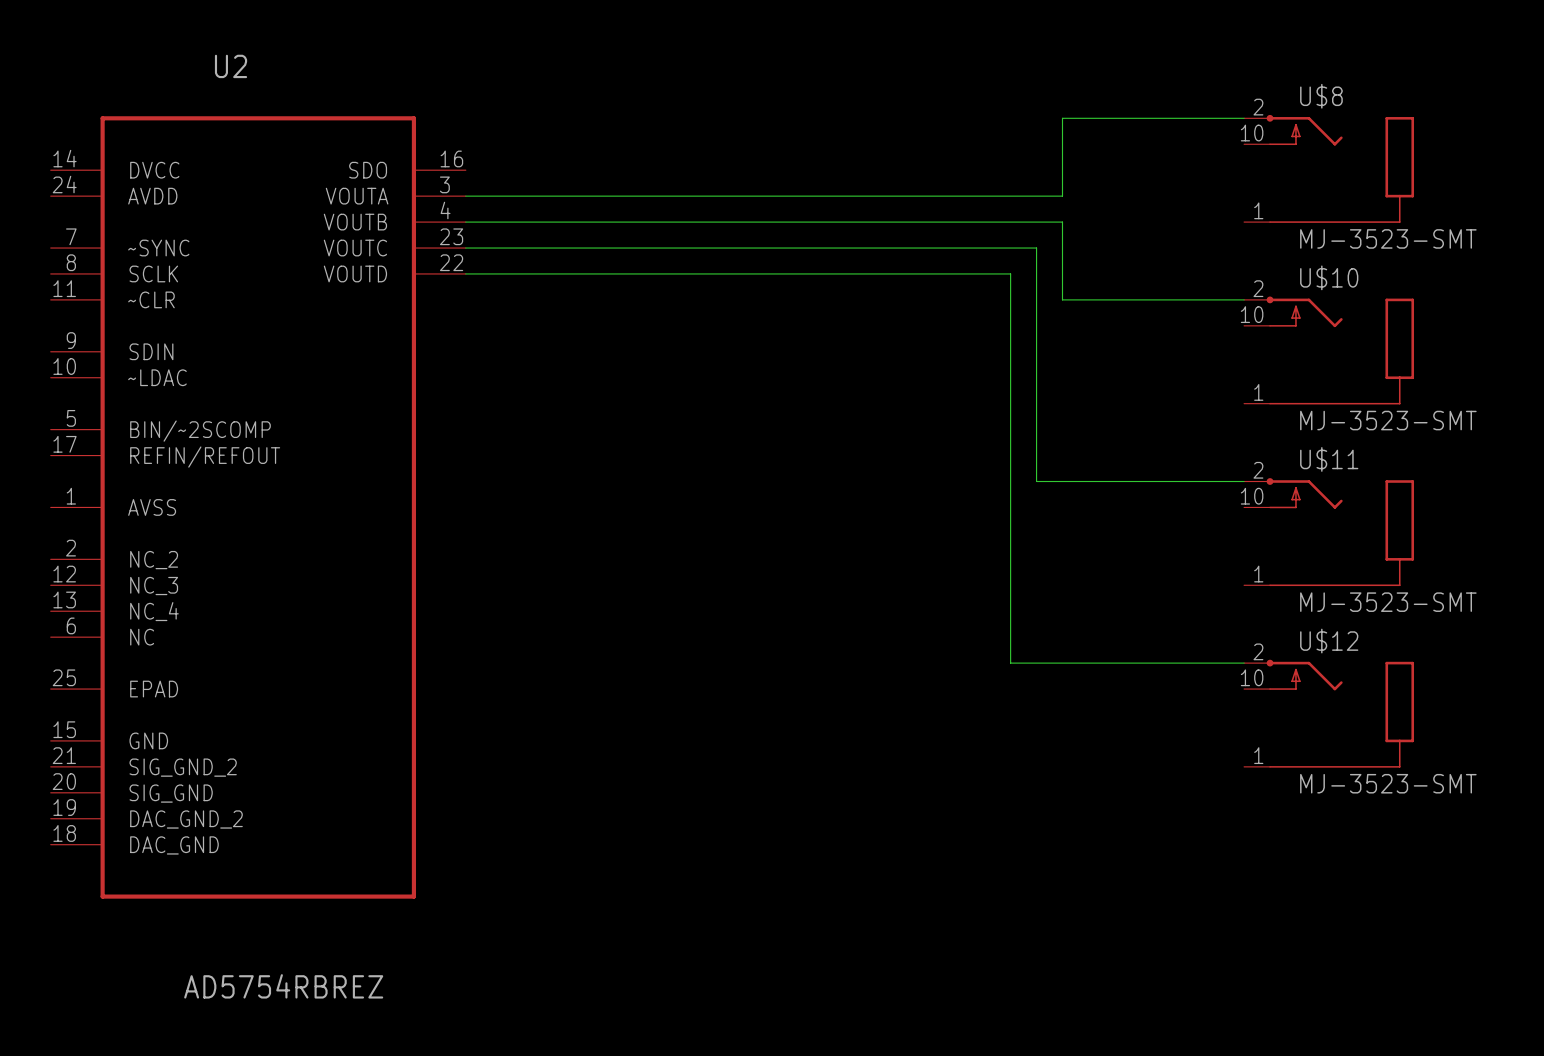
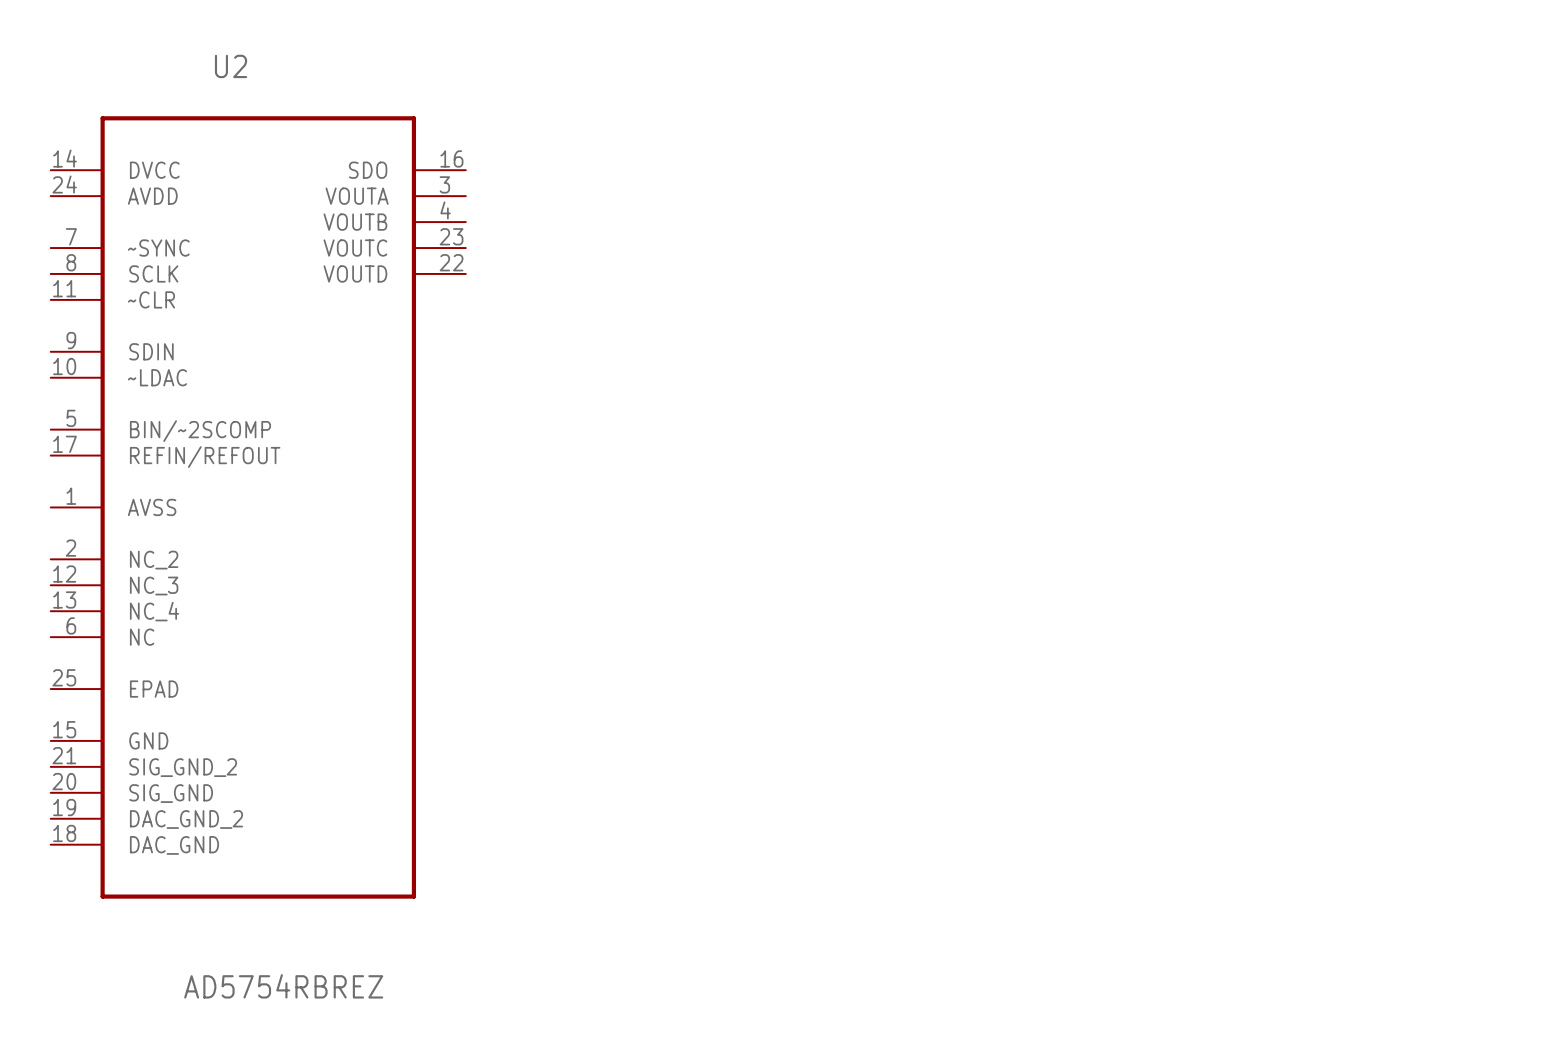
wire: (1244, 118) (1062, 118) (1062, 196) (465, 196) -> none
U$8: MJ-3523-SMT (1329, 168) -> none
wire: (465, 222) (1062, 222) (1062, 299) (1244, 299) -> none
wire: (465, 248) (1036, 248) (1036, 481) (1244, 481) -> none
wire: (465, 273) (1010, 273) (1010, 663) (1244, 663) -> none
U$10: MJ-3523-SMT (1329, 350) -> none
U$11: MJ-3523-SMT (1329, 532) -> none
U$12: MJ-3523-SMT (1329, 713) -> none

